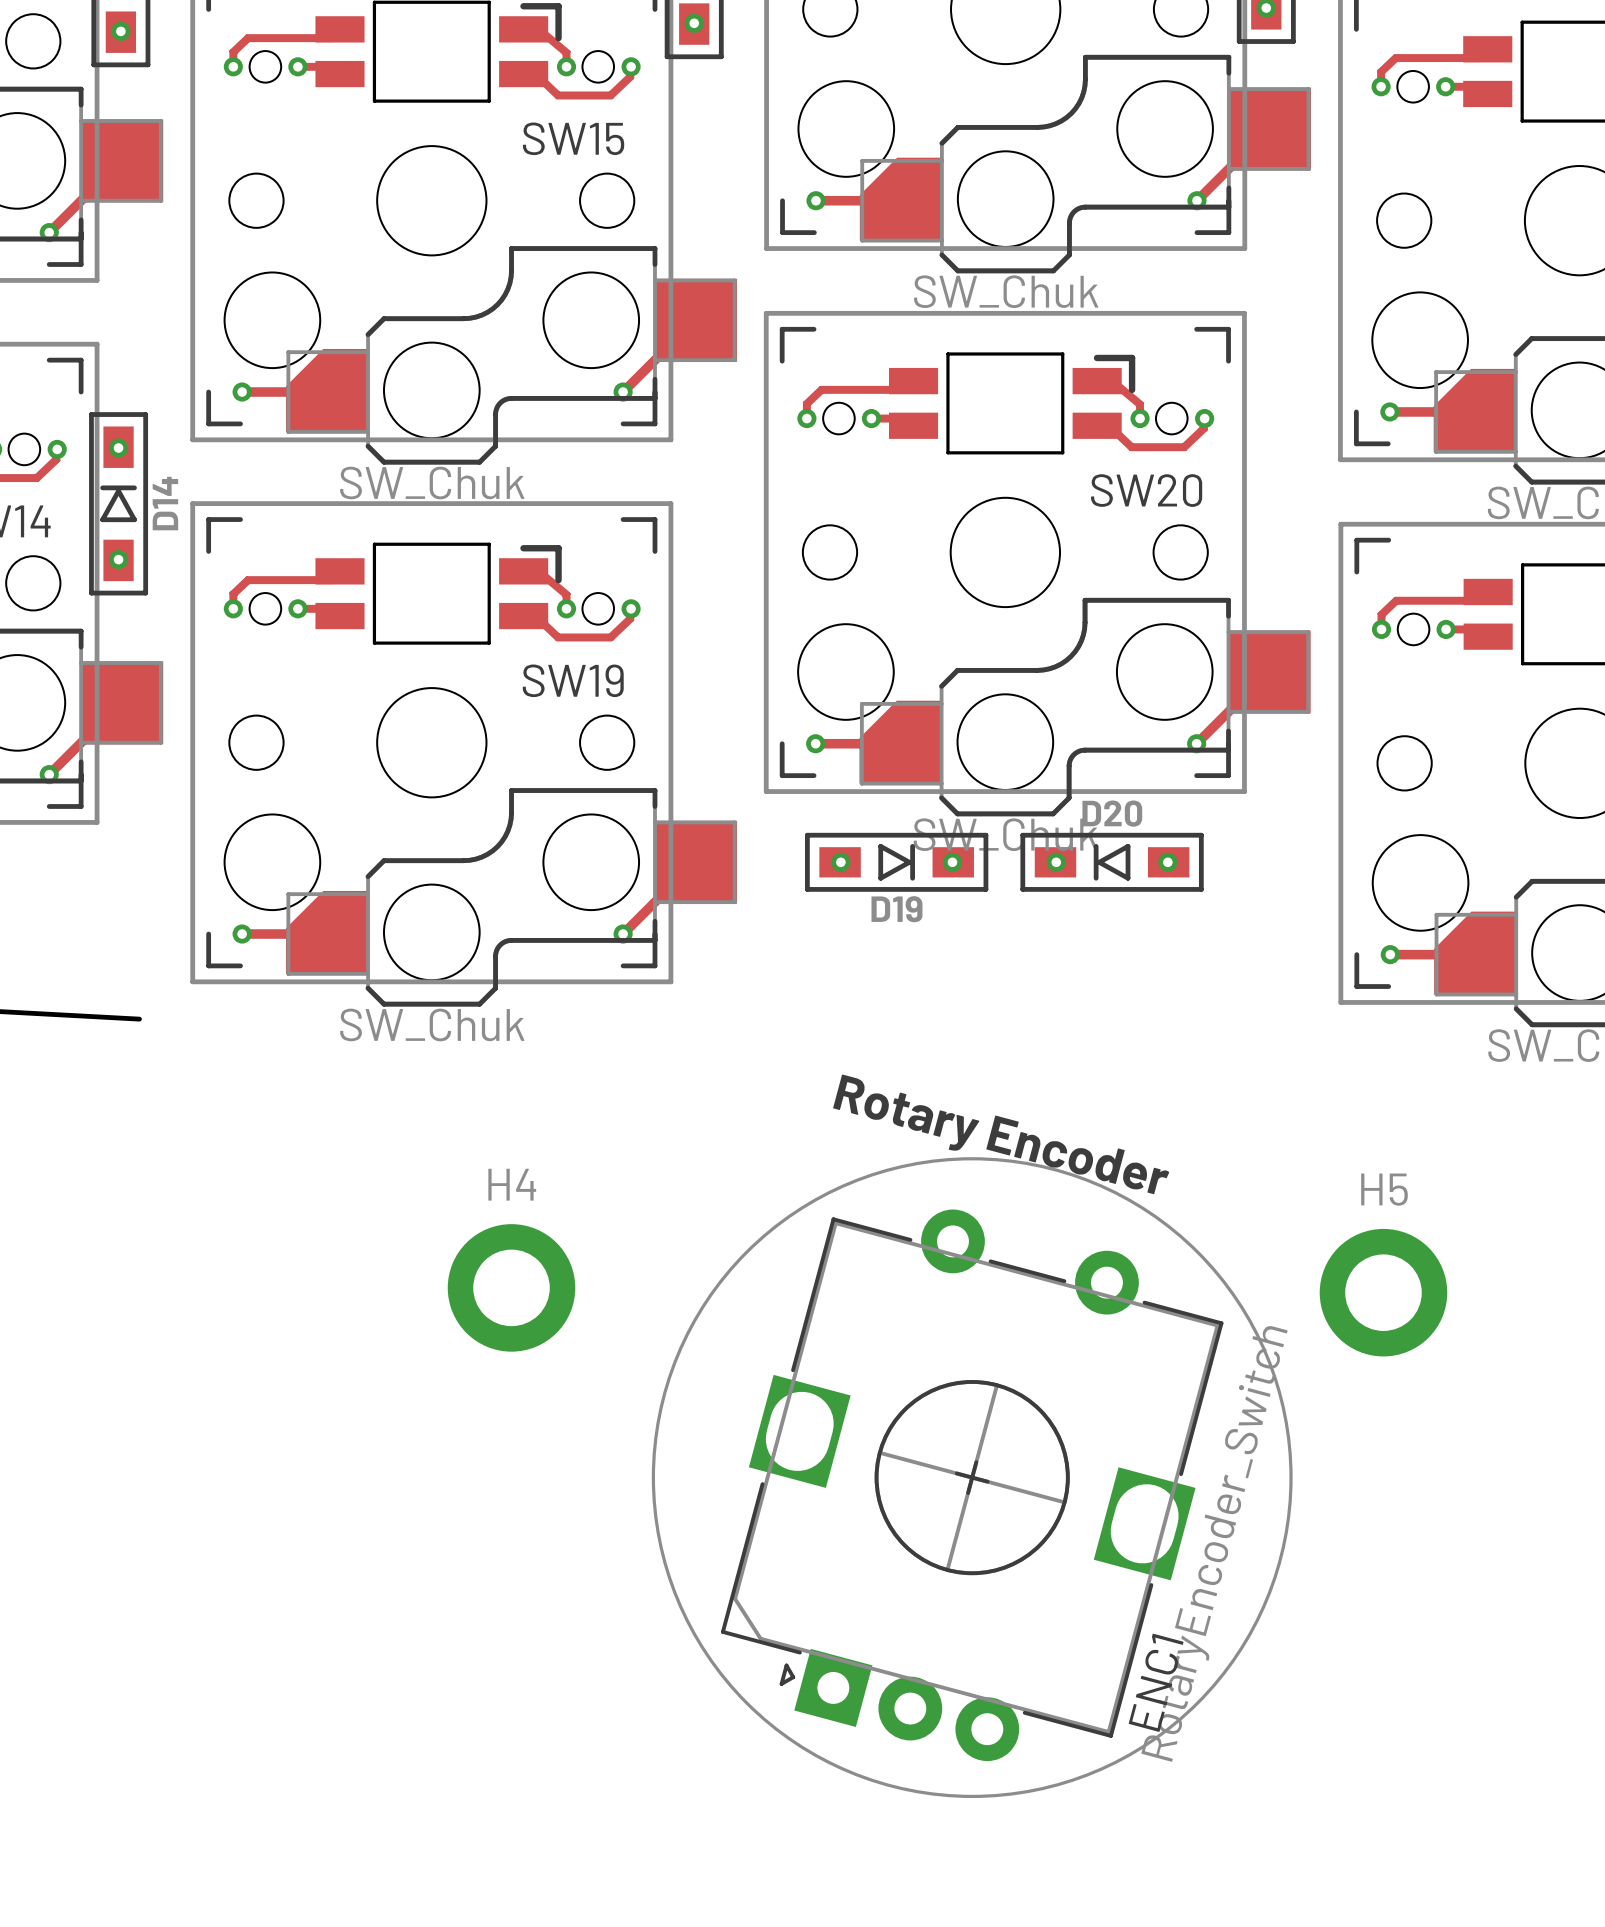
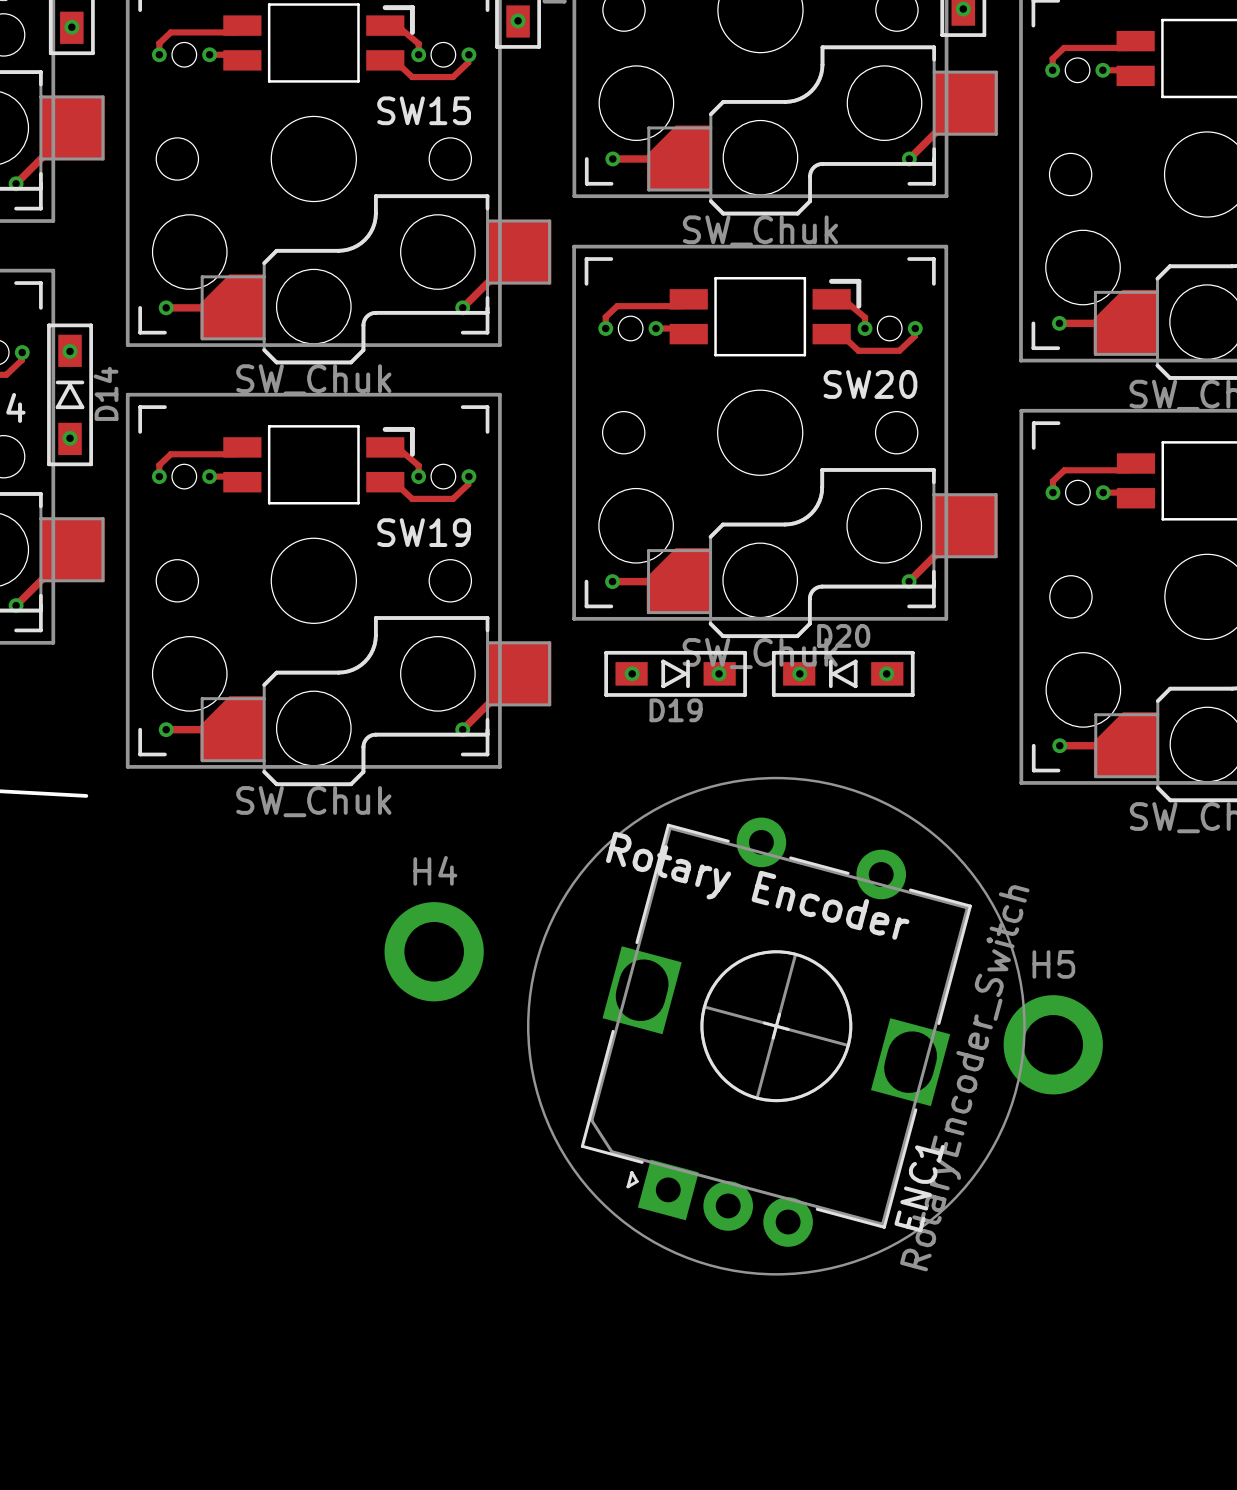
H4 position: (511, 1287) -> (434, 951)
H5 position: (1383, 1292) -> (1053, 1044)
ENC1 position: (972, 1477) -> (776, 1026)

